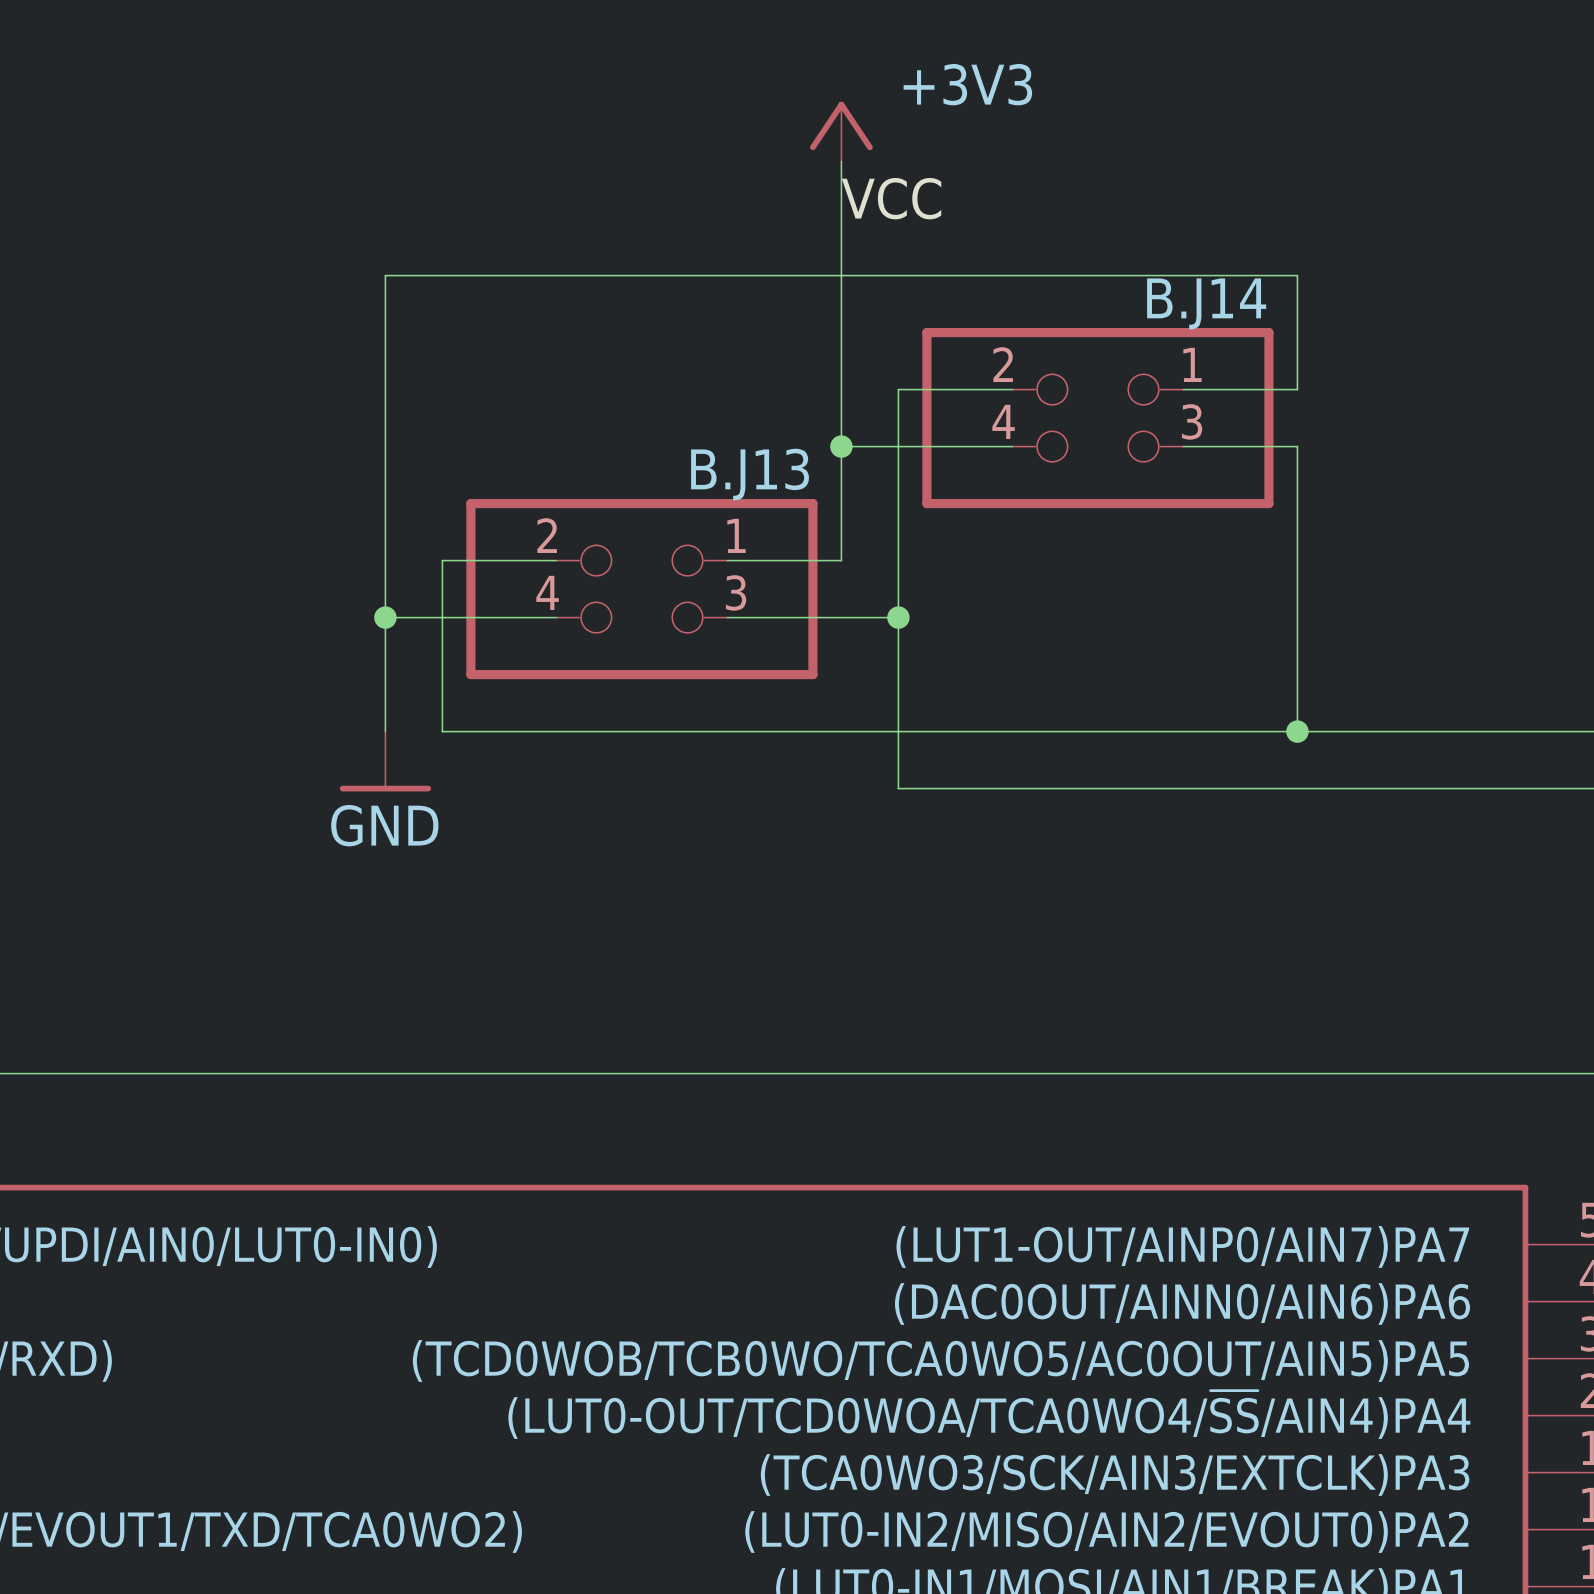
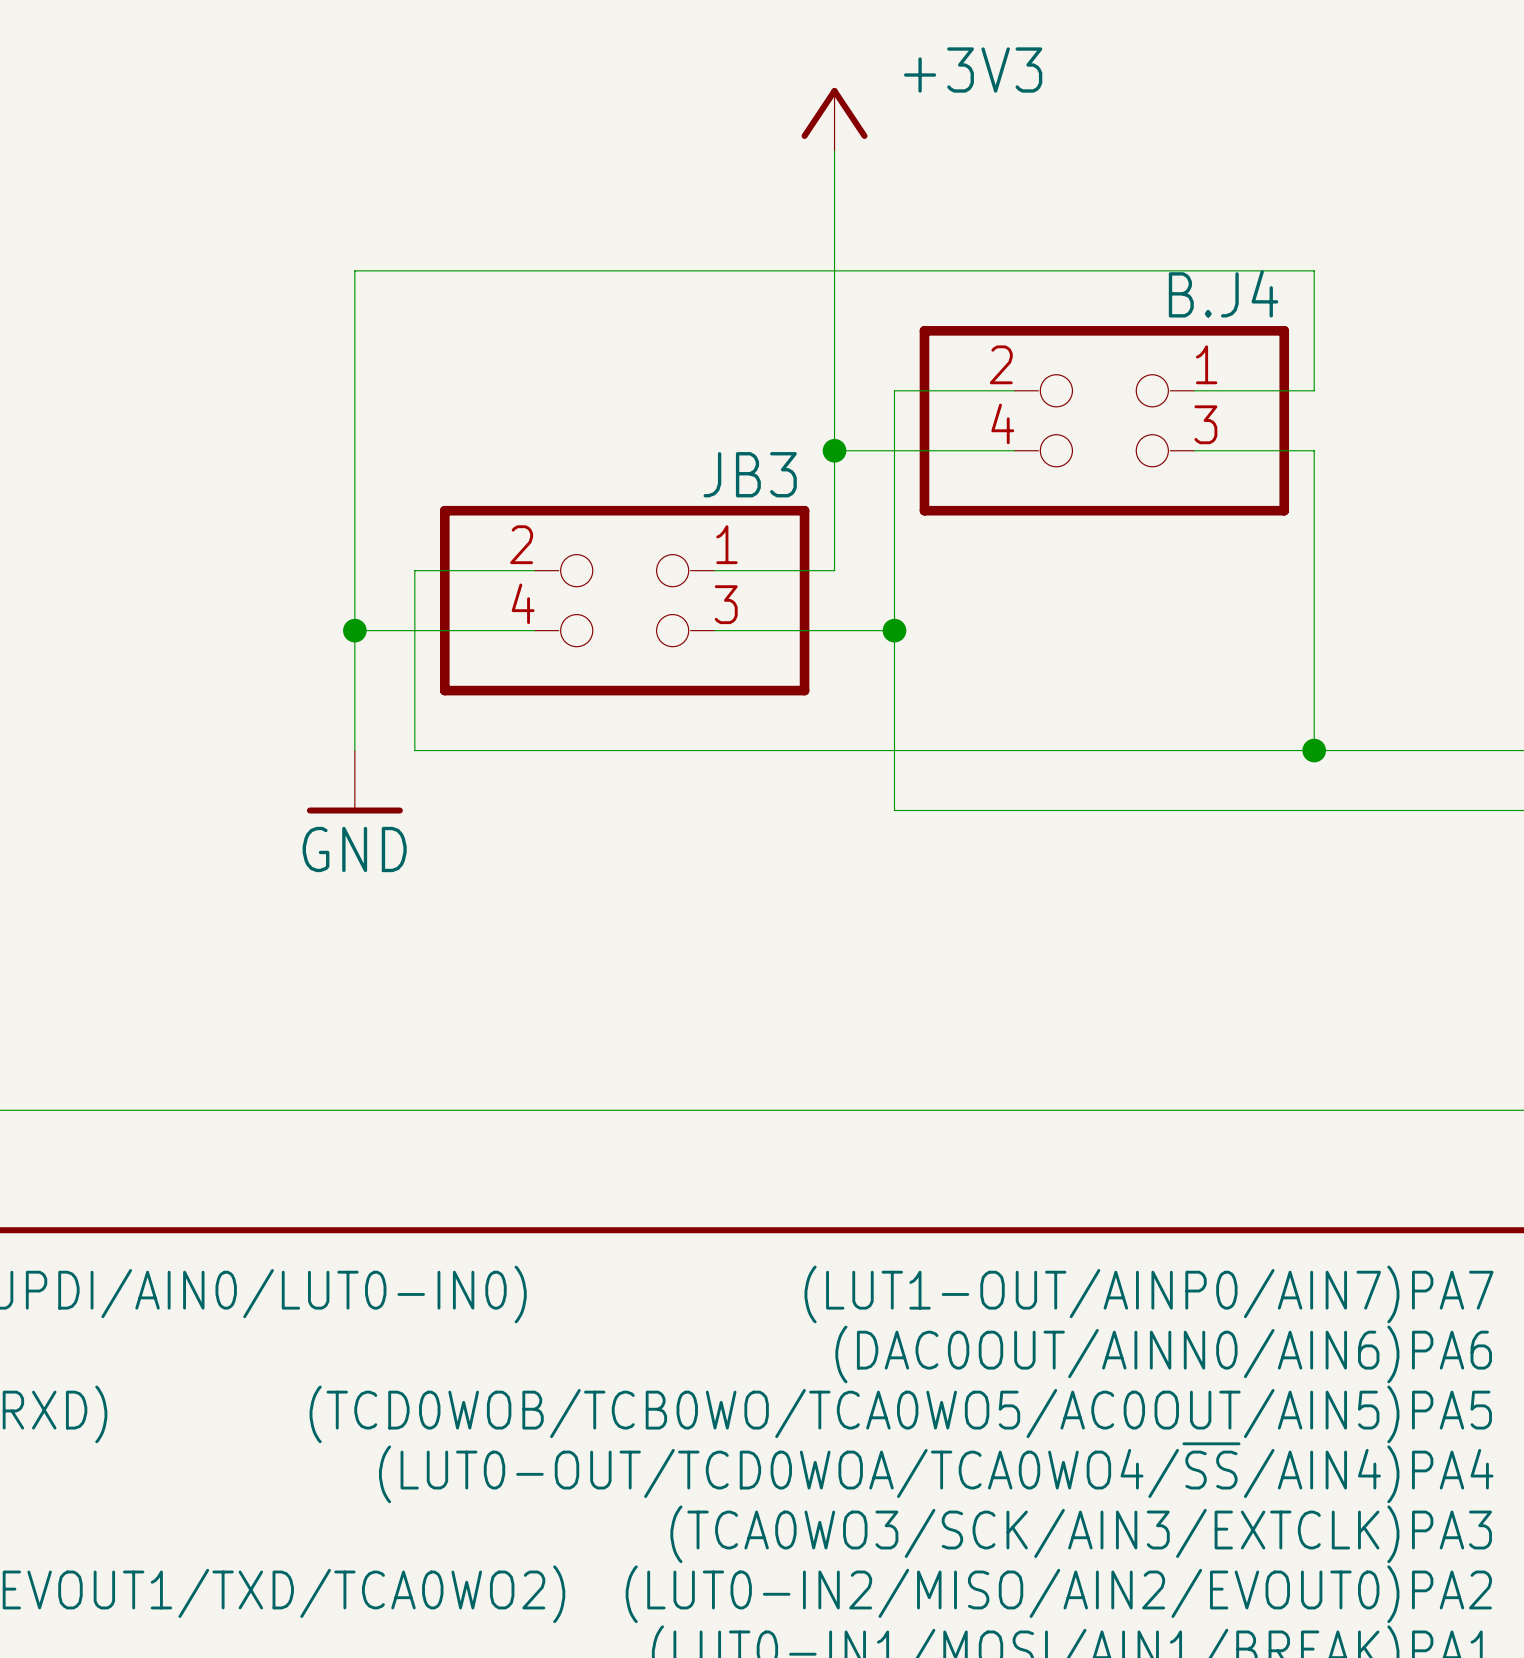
label: VCC (891, 198) -> none
B.J14 name: B.J14 (1206, 303) -> B.J4 (1223, 293)
B.J13 name: B.J13 (750, 474) -> JB3 (750, 474)

